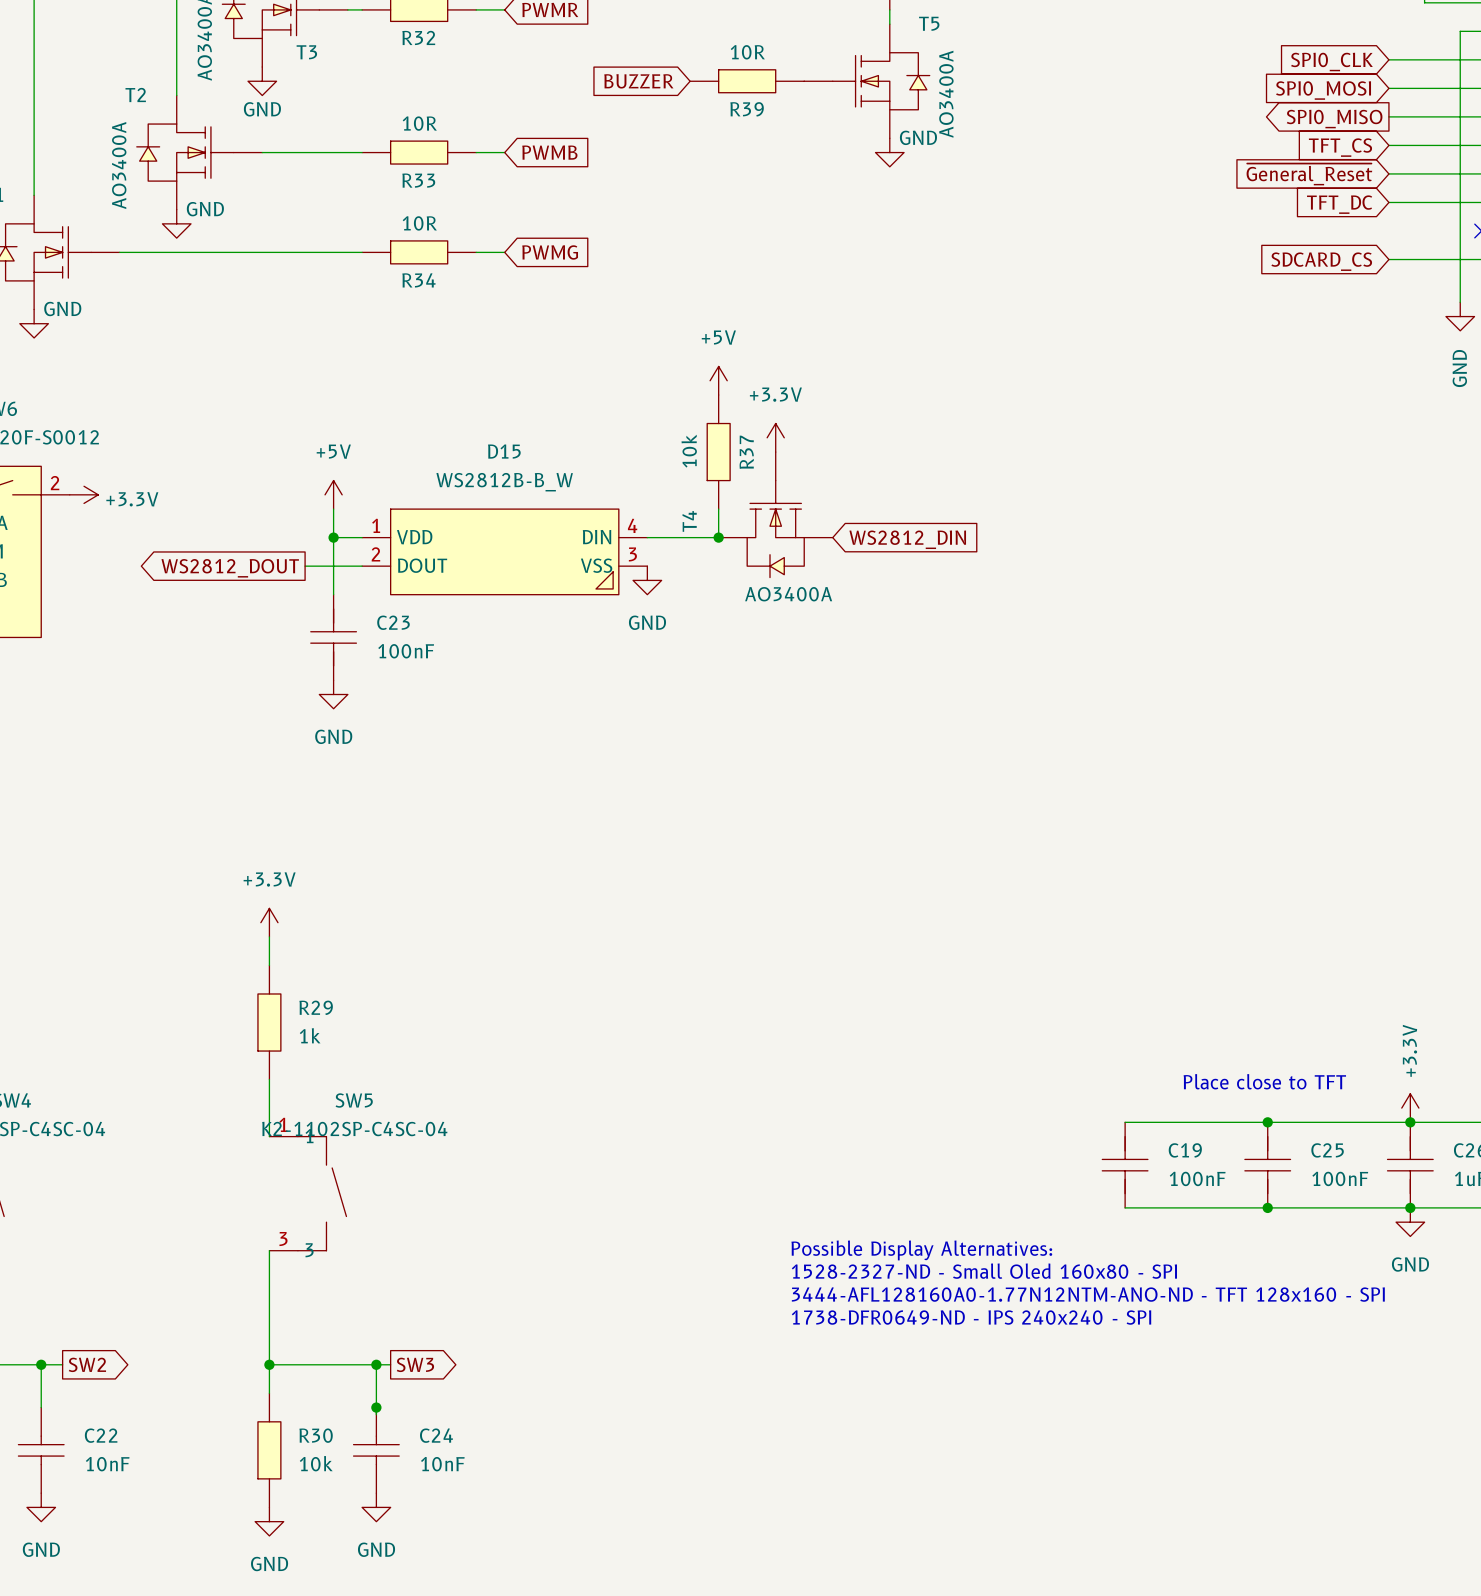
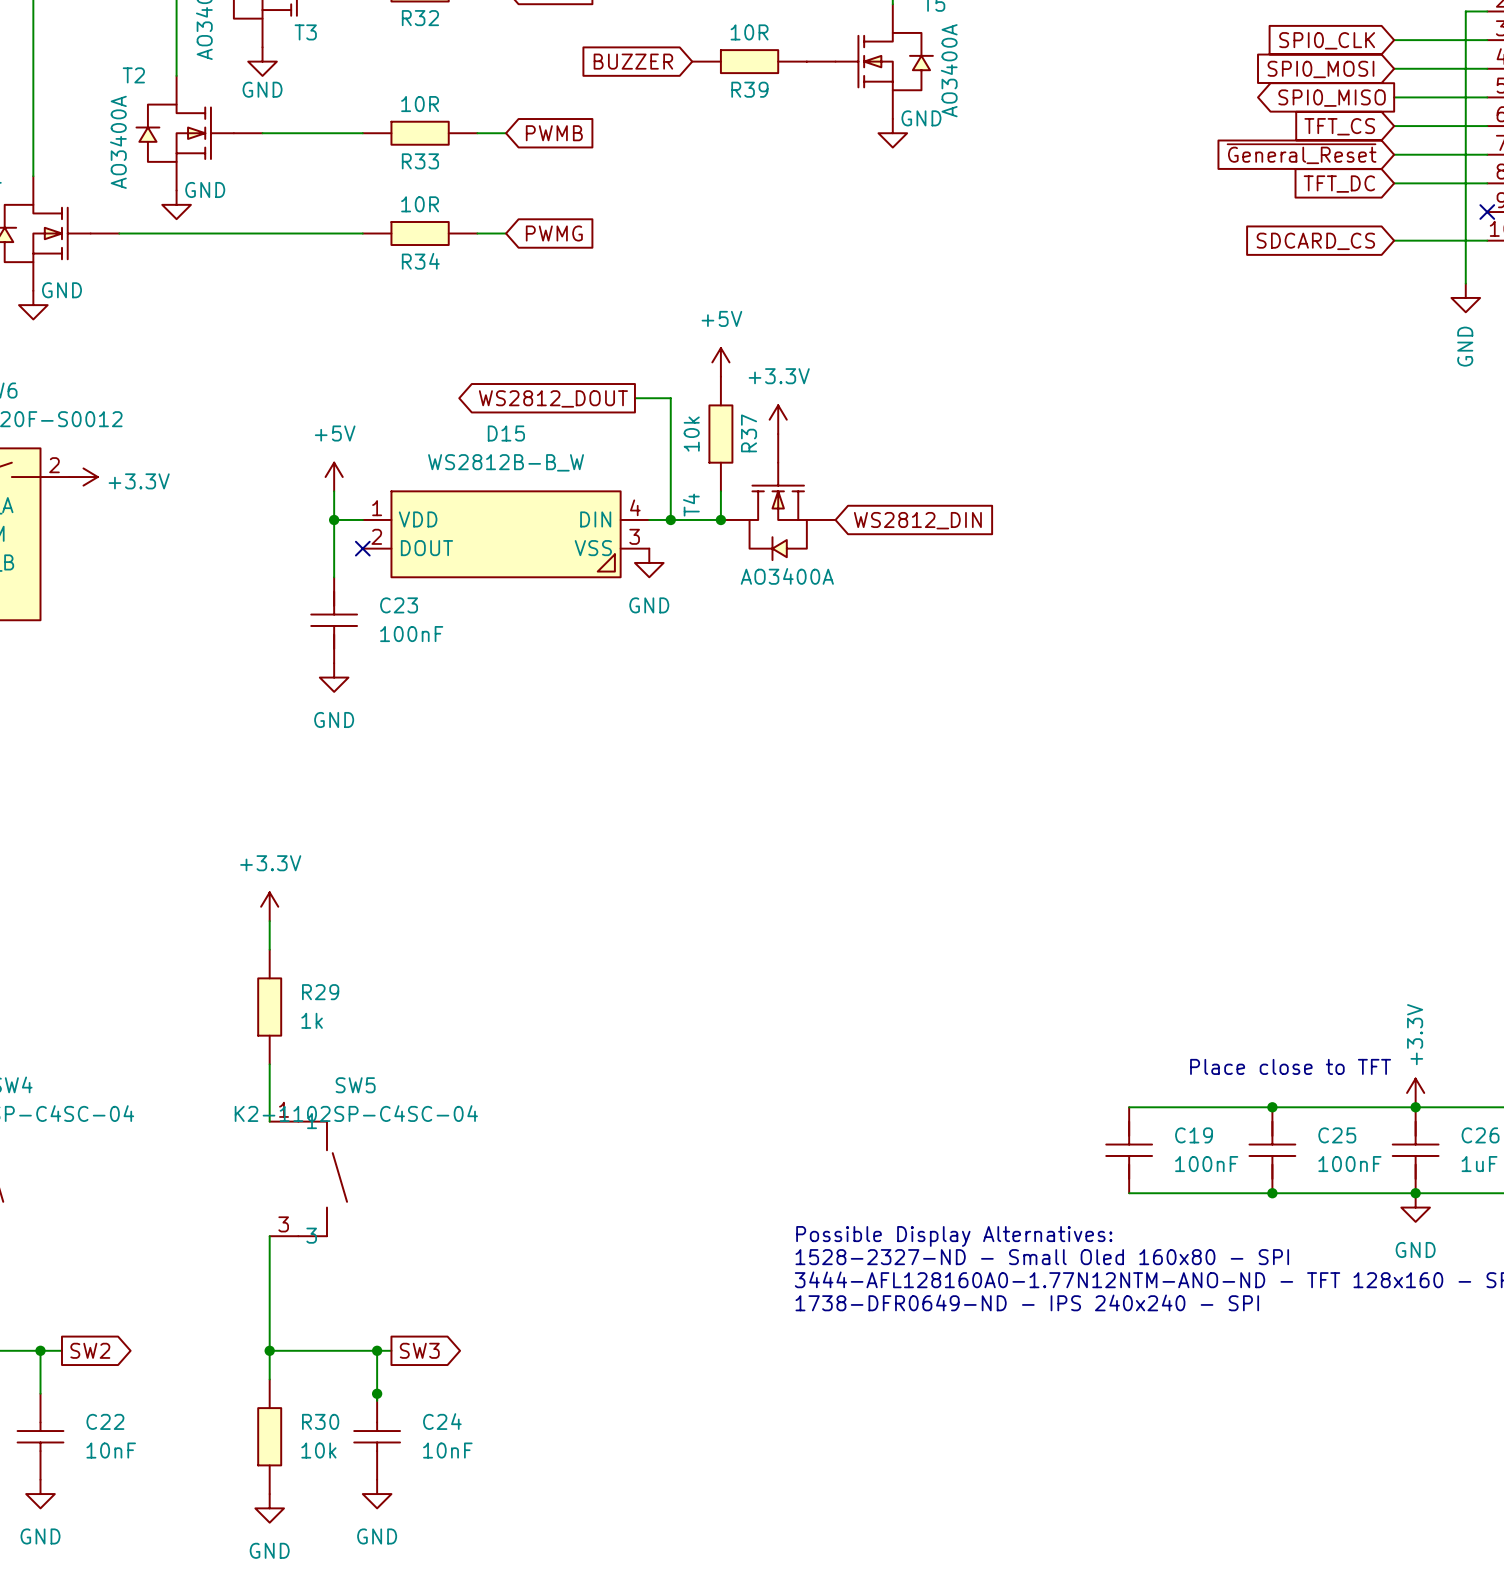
wire: none -> (634, 398) (670, 398) (670, 519)
global label: none -> WS2812_DOUT (553, 398)
junction: none -> (670, 519)
wire: (305, 566) (362, 566) -> none
no-connect mark: none -> (362, 548)
global label: WS2812_DOUT (230, 568) -> none

